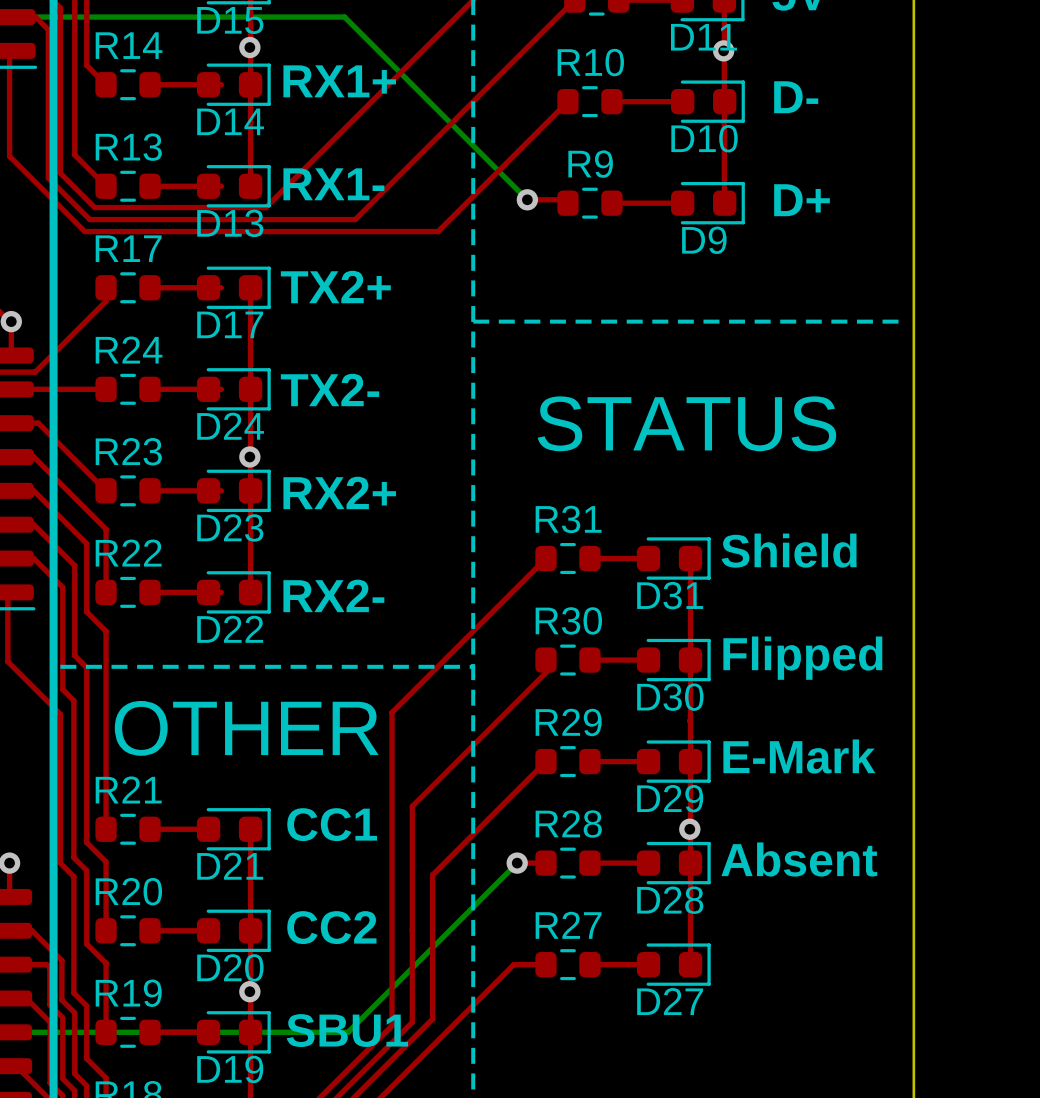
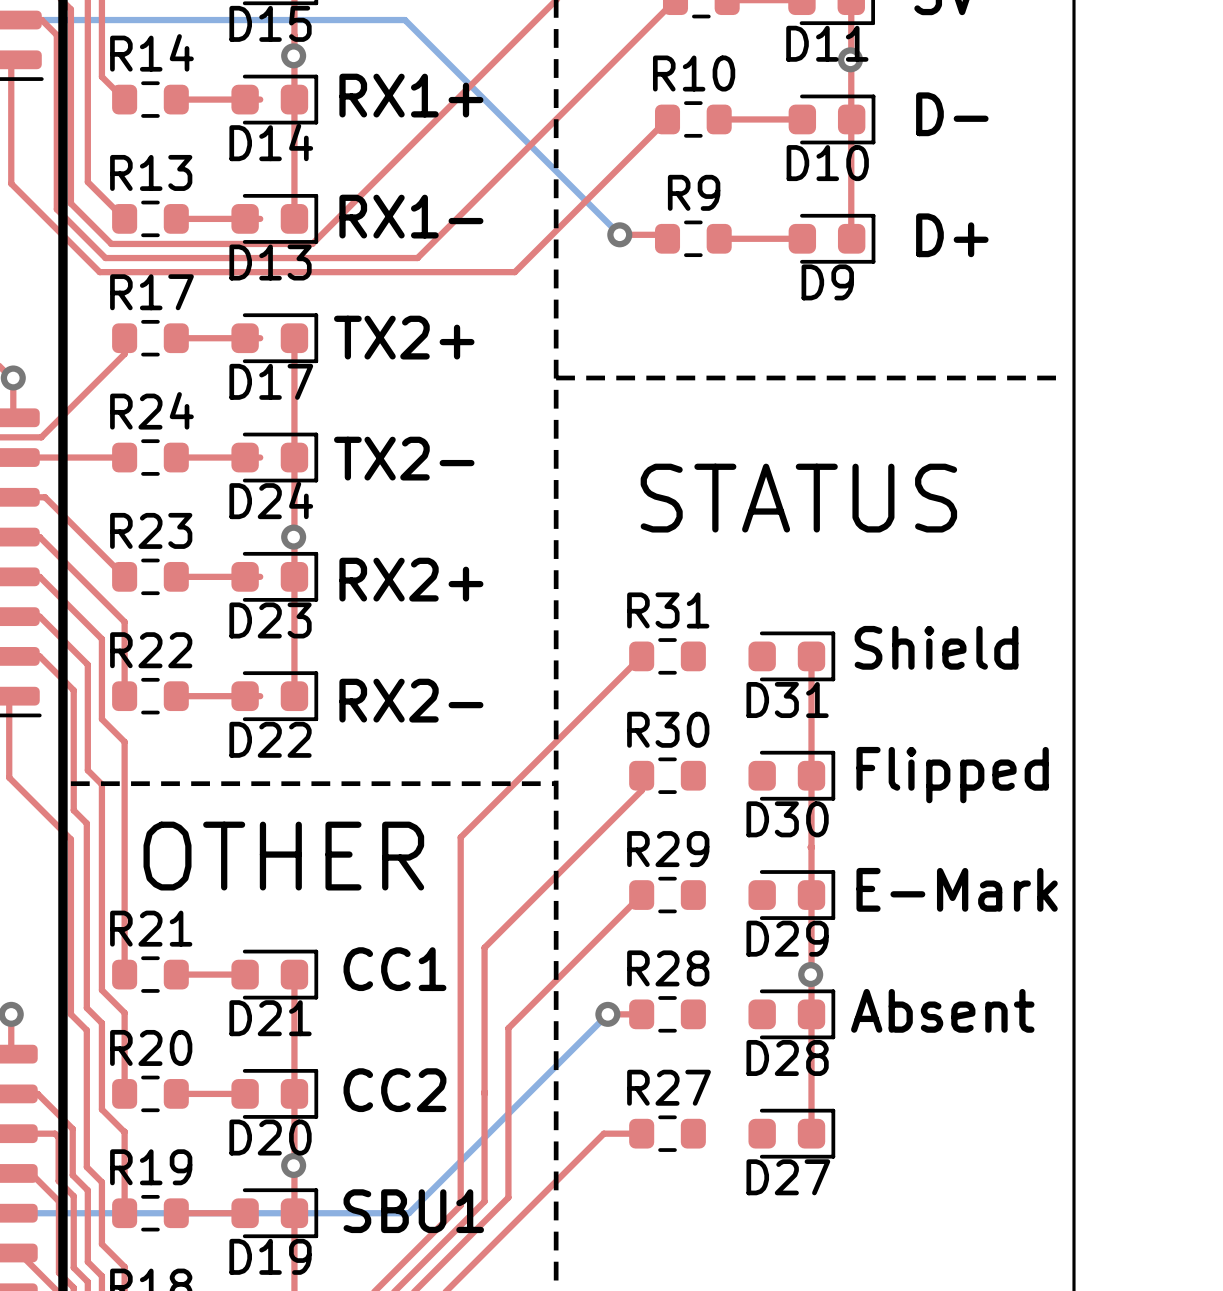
top track: (589, 558) (648, 558) -> none
top track: (589, 660) (648, 660) -> none
top track: (589, 761) (648, 761) -> none
top track: (589, 863) (648, 863) -> none
top track: (589, 964) (648, 964) -> none

